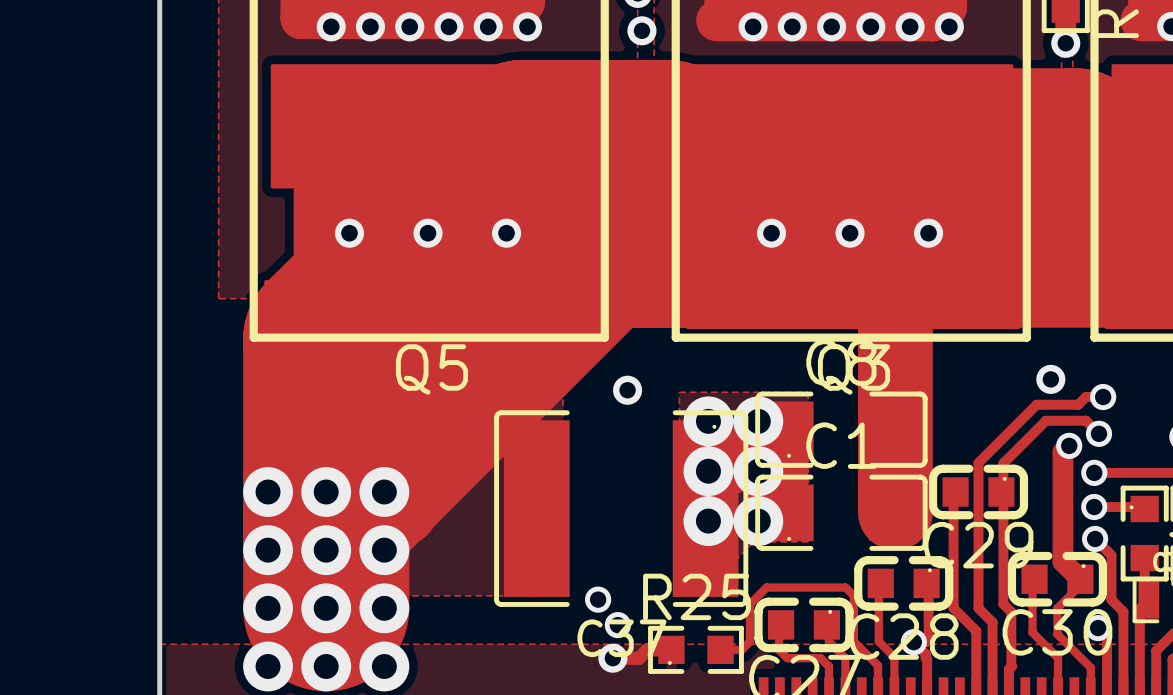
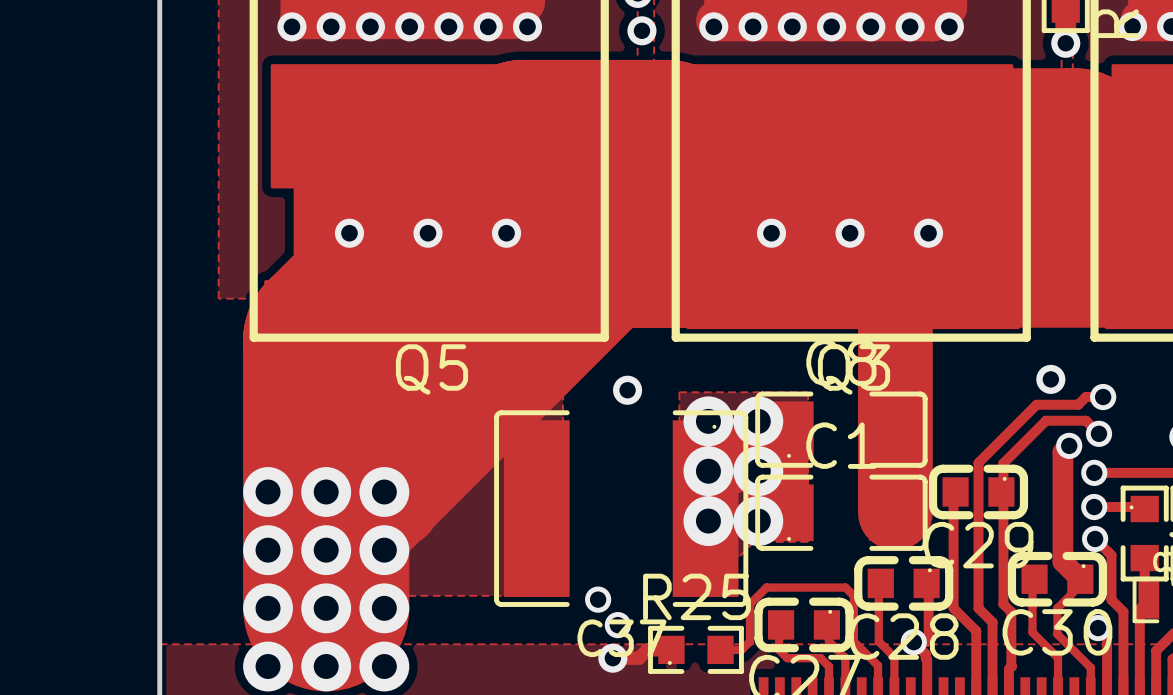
via: none -> (291, 26)
via: none -> (713, 26)
via: none -> (1132, 26)

